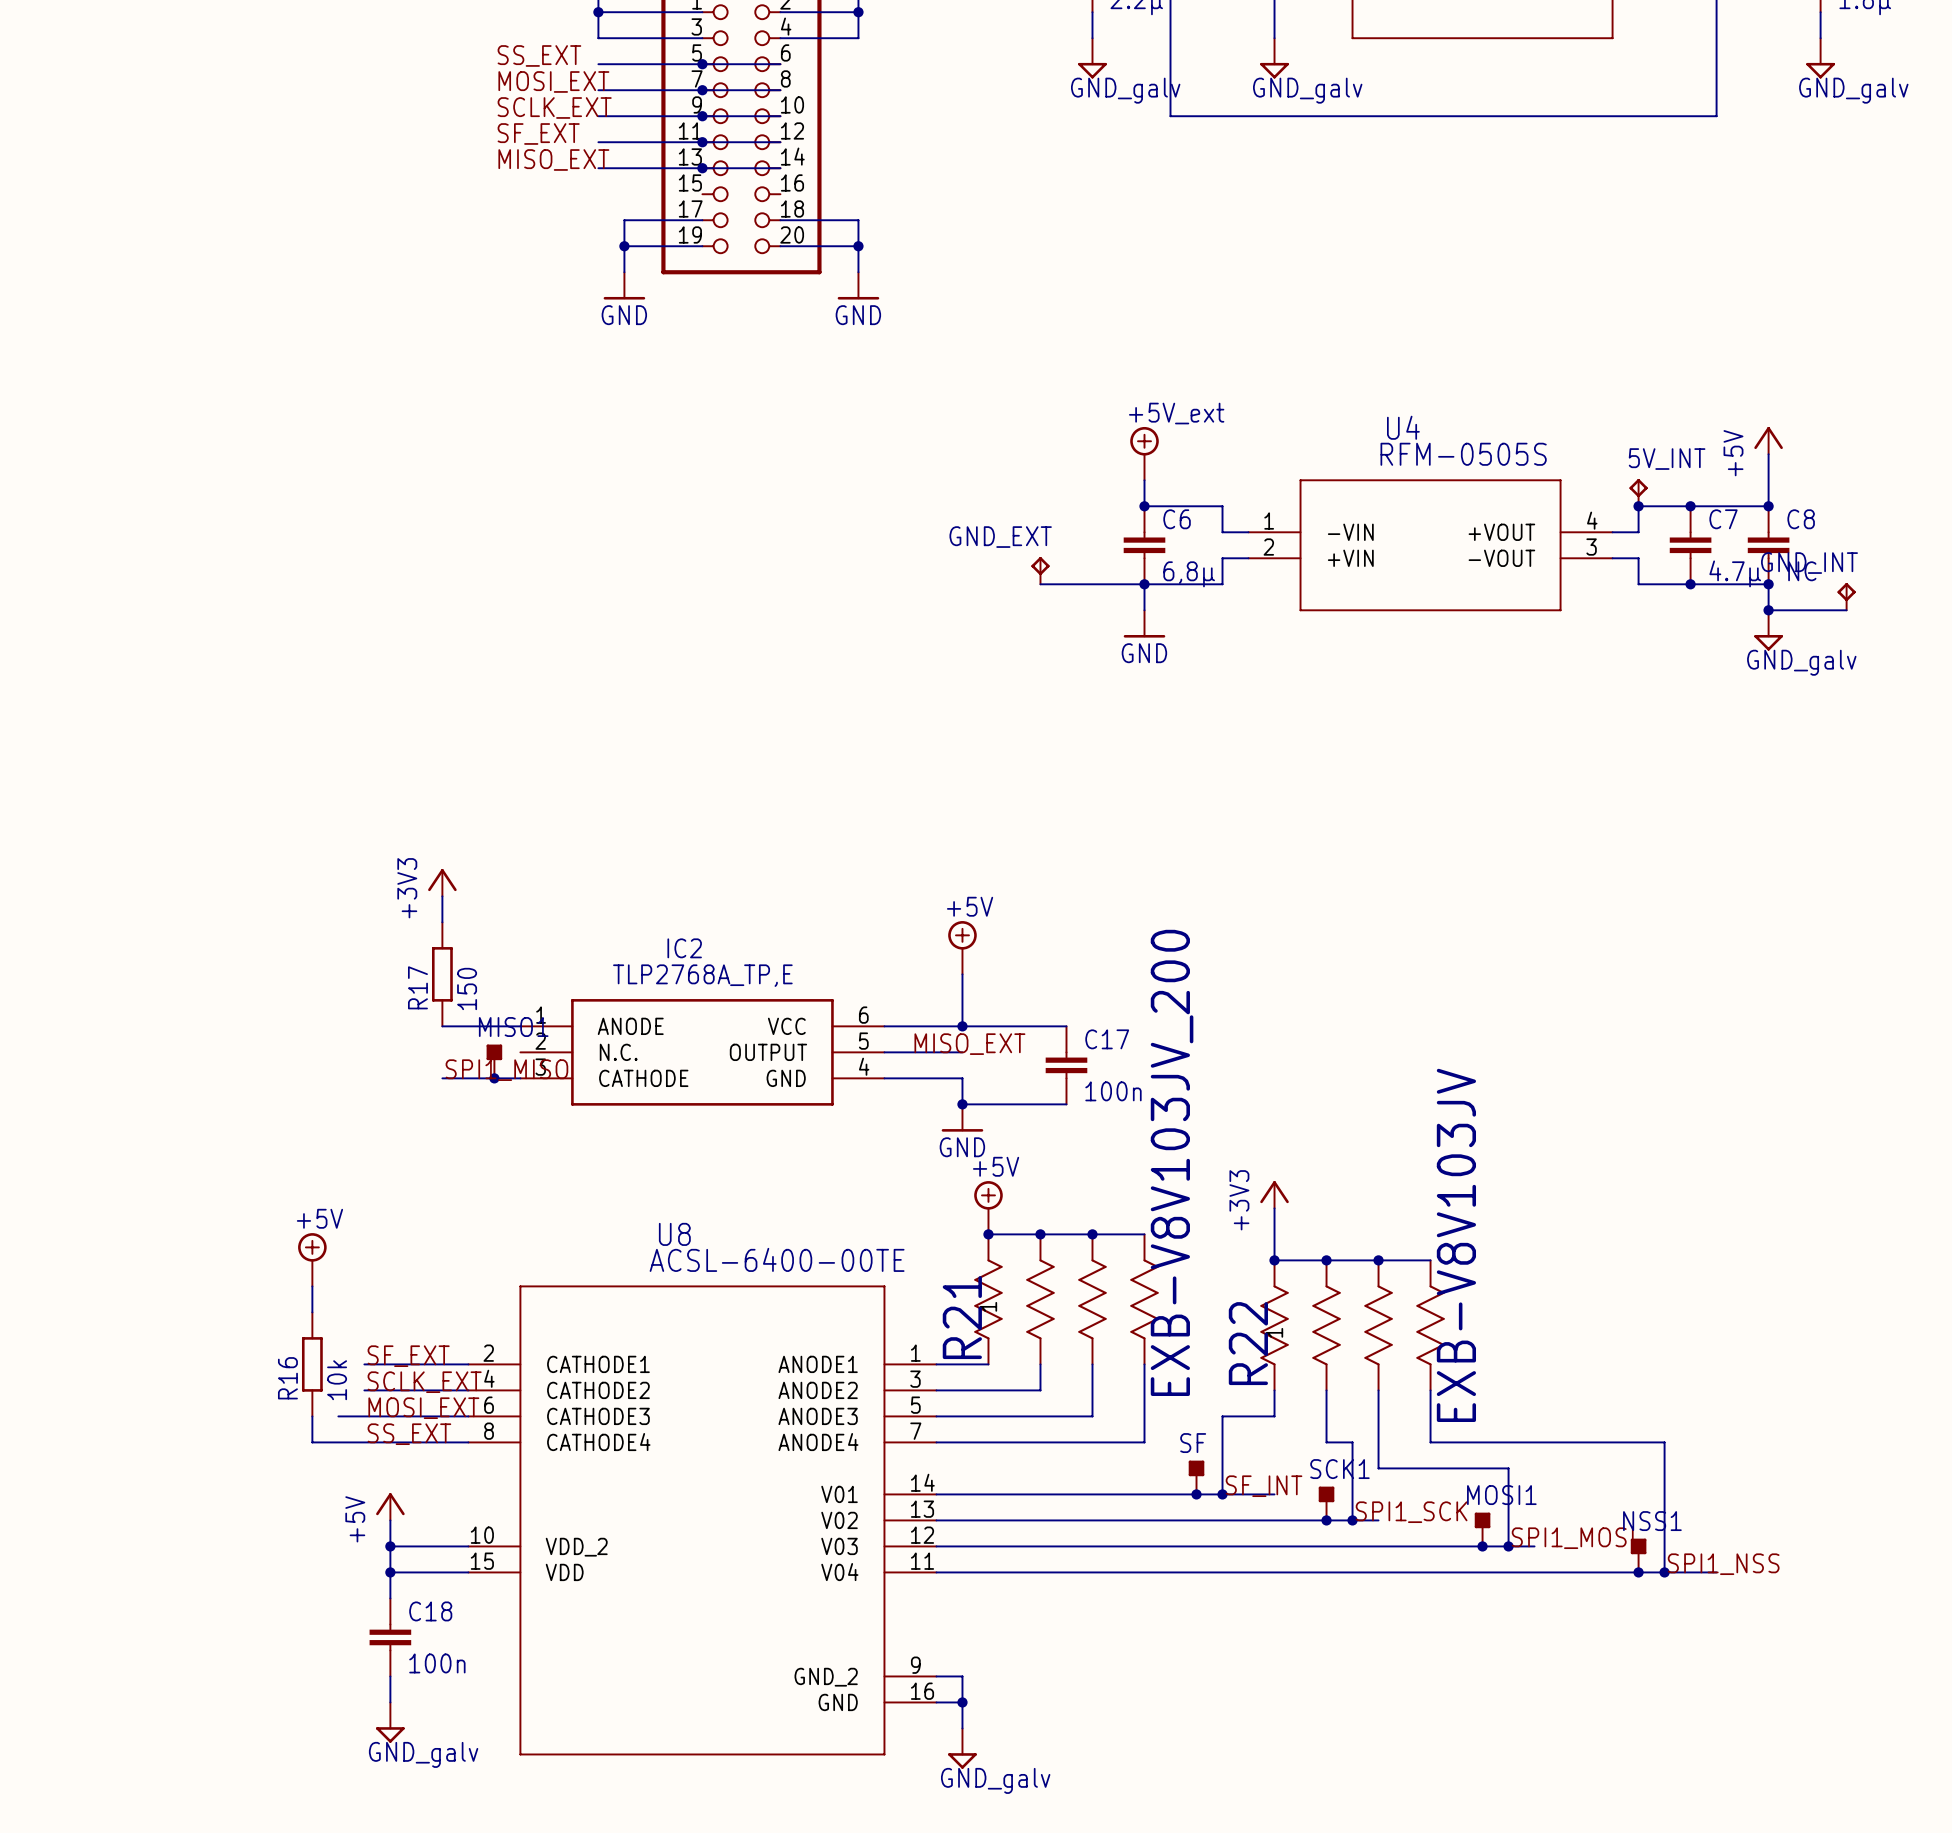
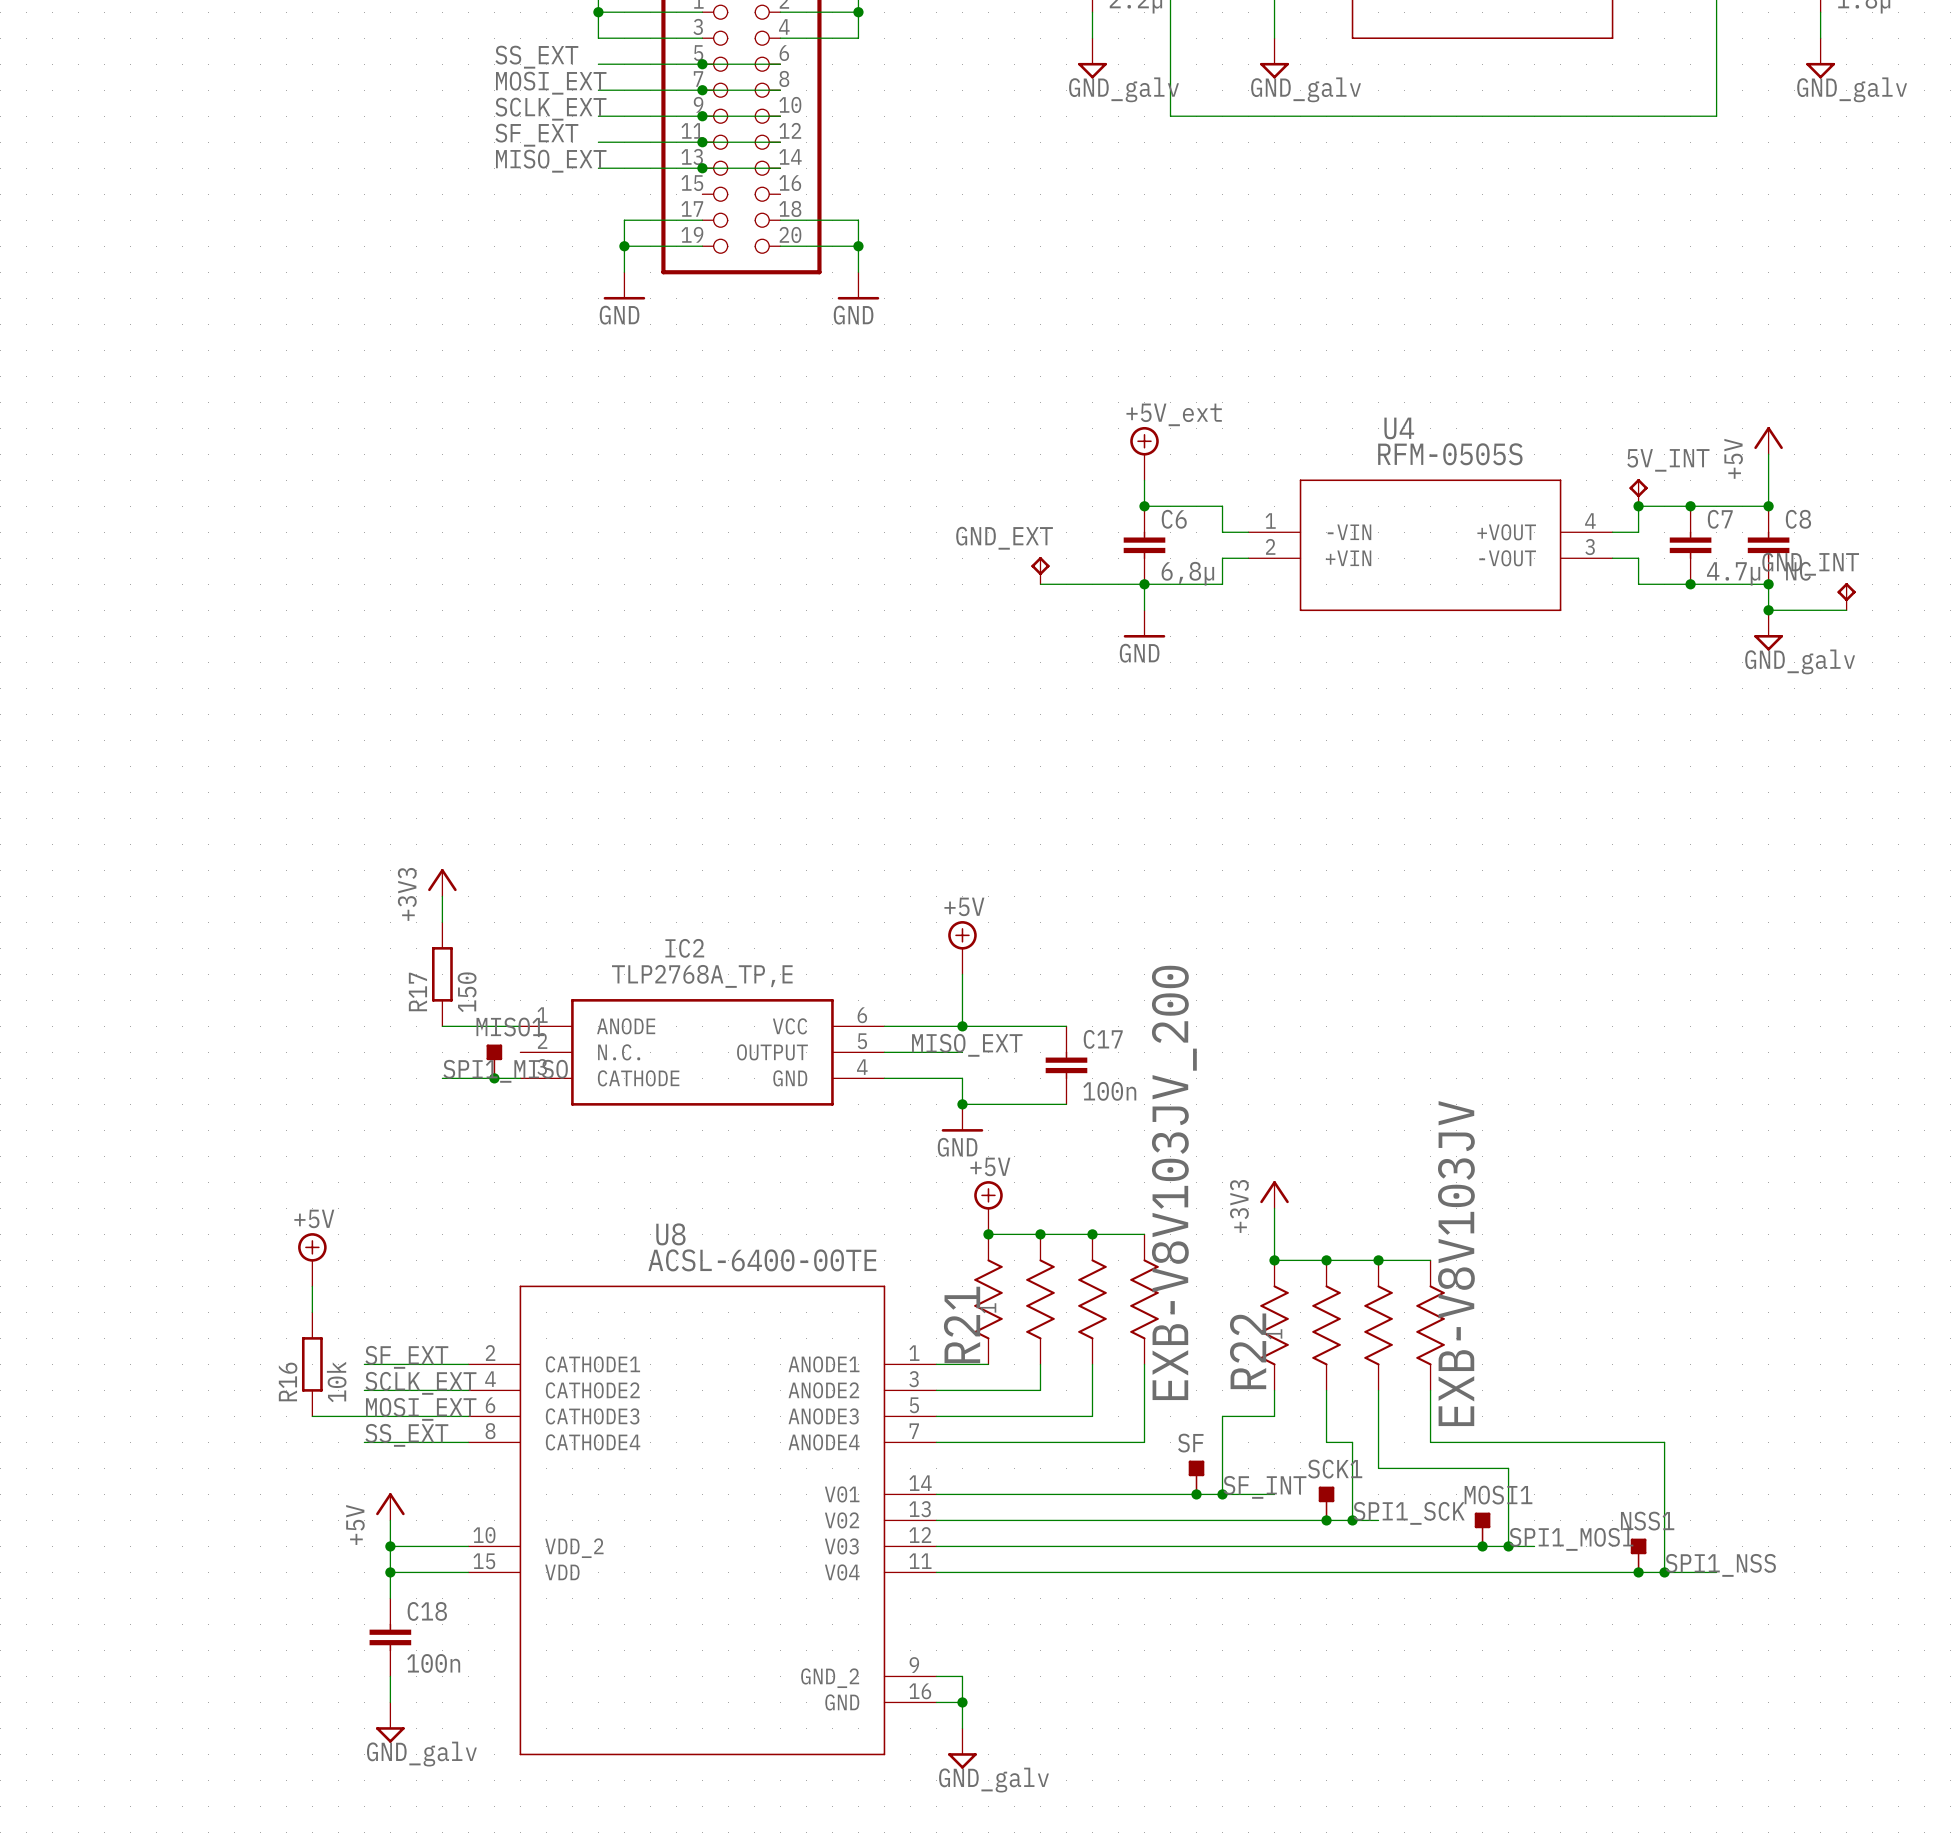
wire: (312, 1416) (312, 1442) (364, 1442) -> (312, 1416) (338, 1416)

